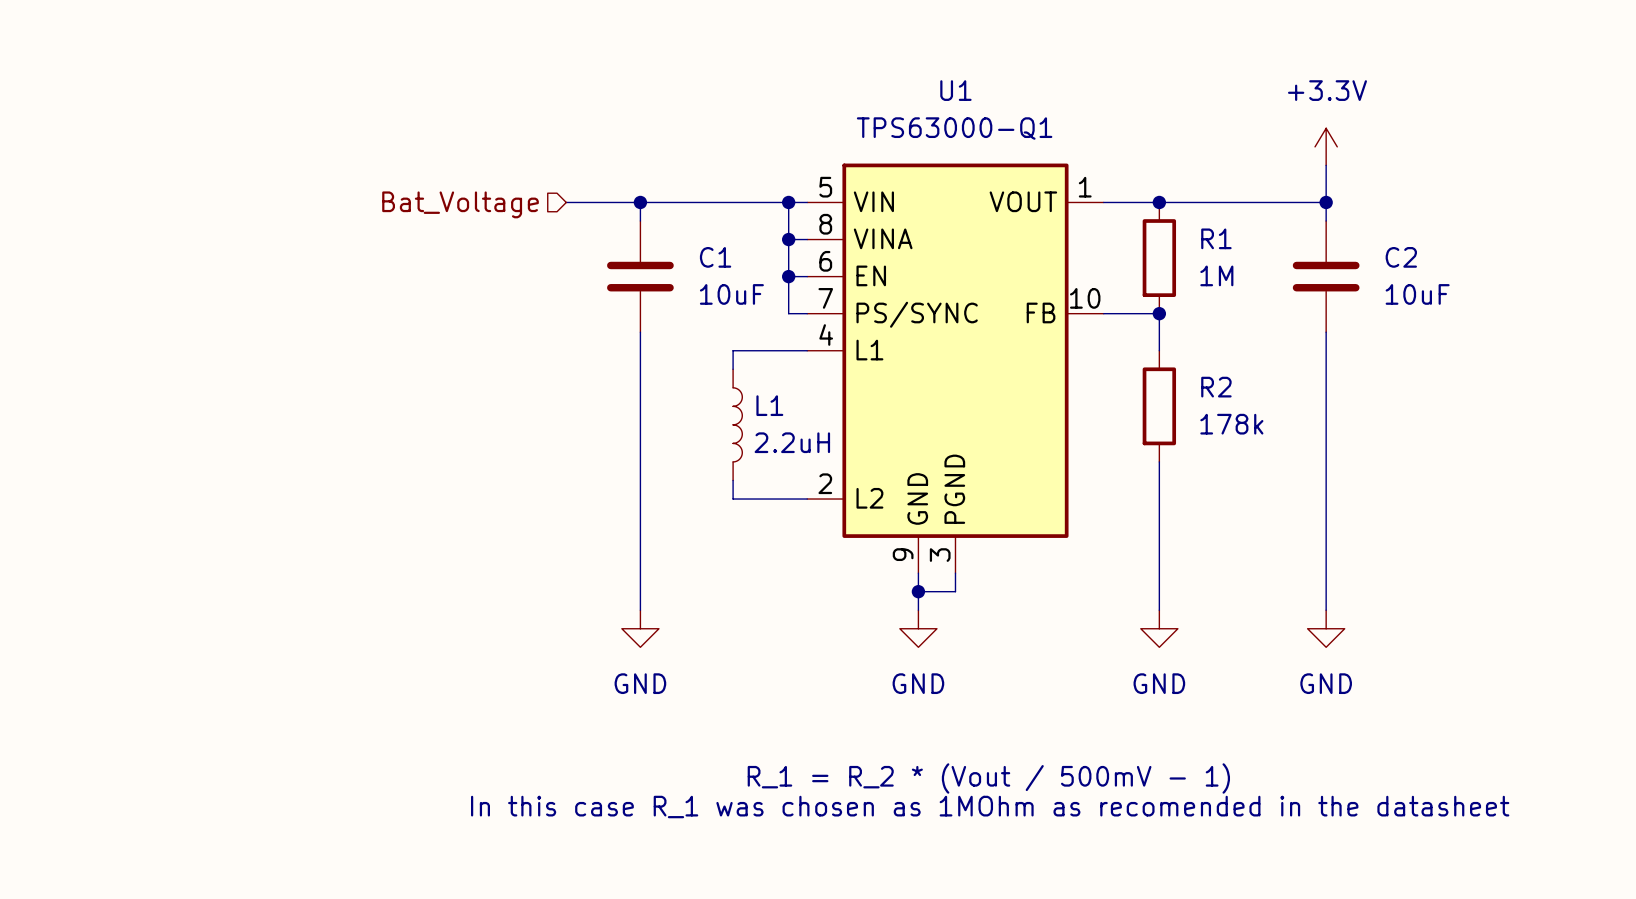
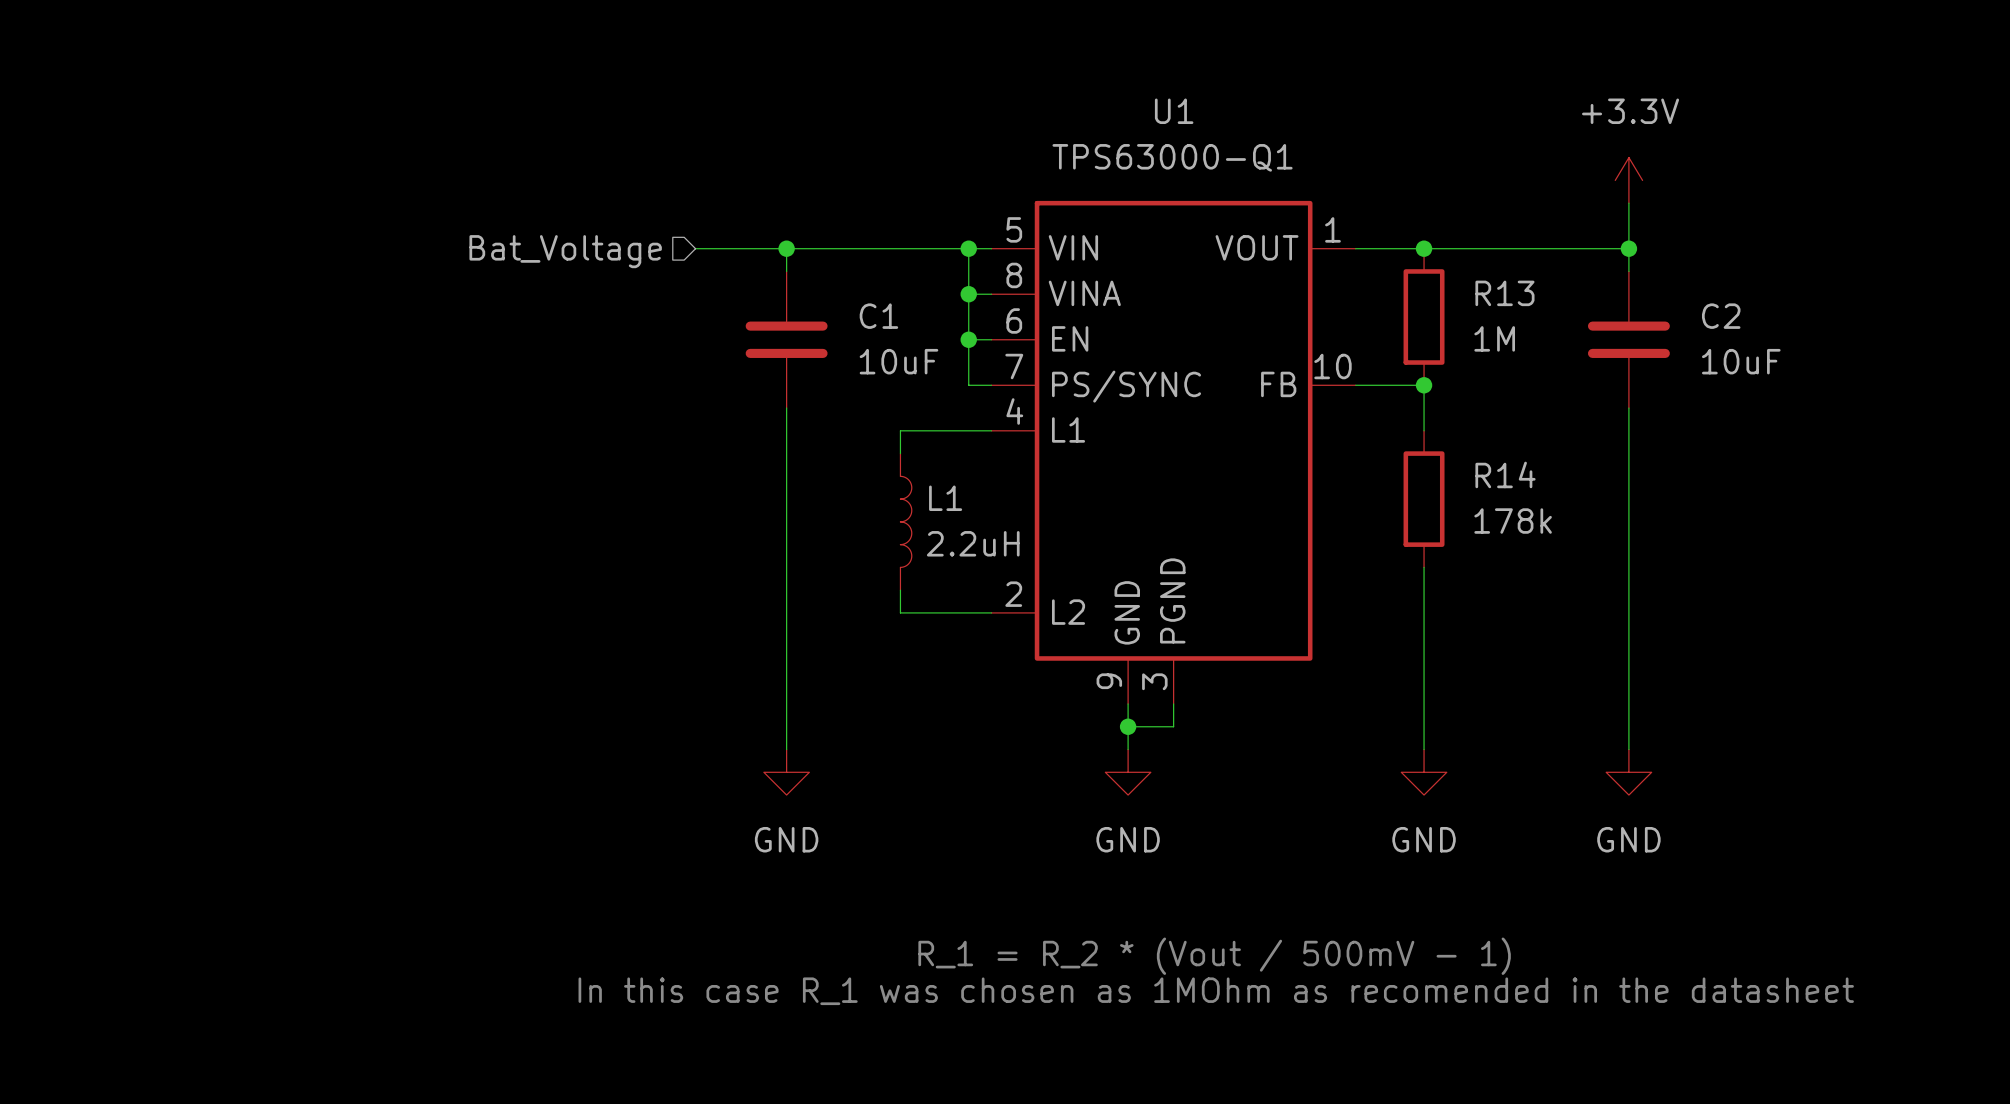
R1 name: R1 (1216, 238) -> R13 (1504, 293)
R2 name: R2 (1216, 387) -> R14 (1505, 474)

